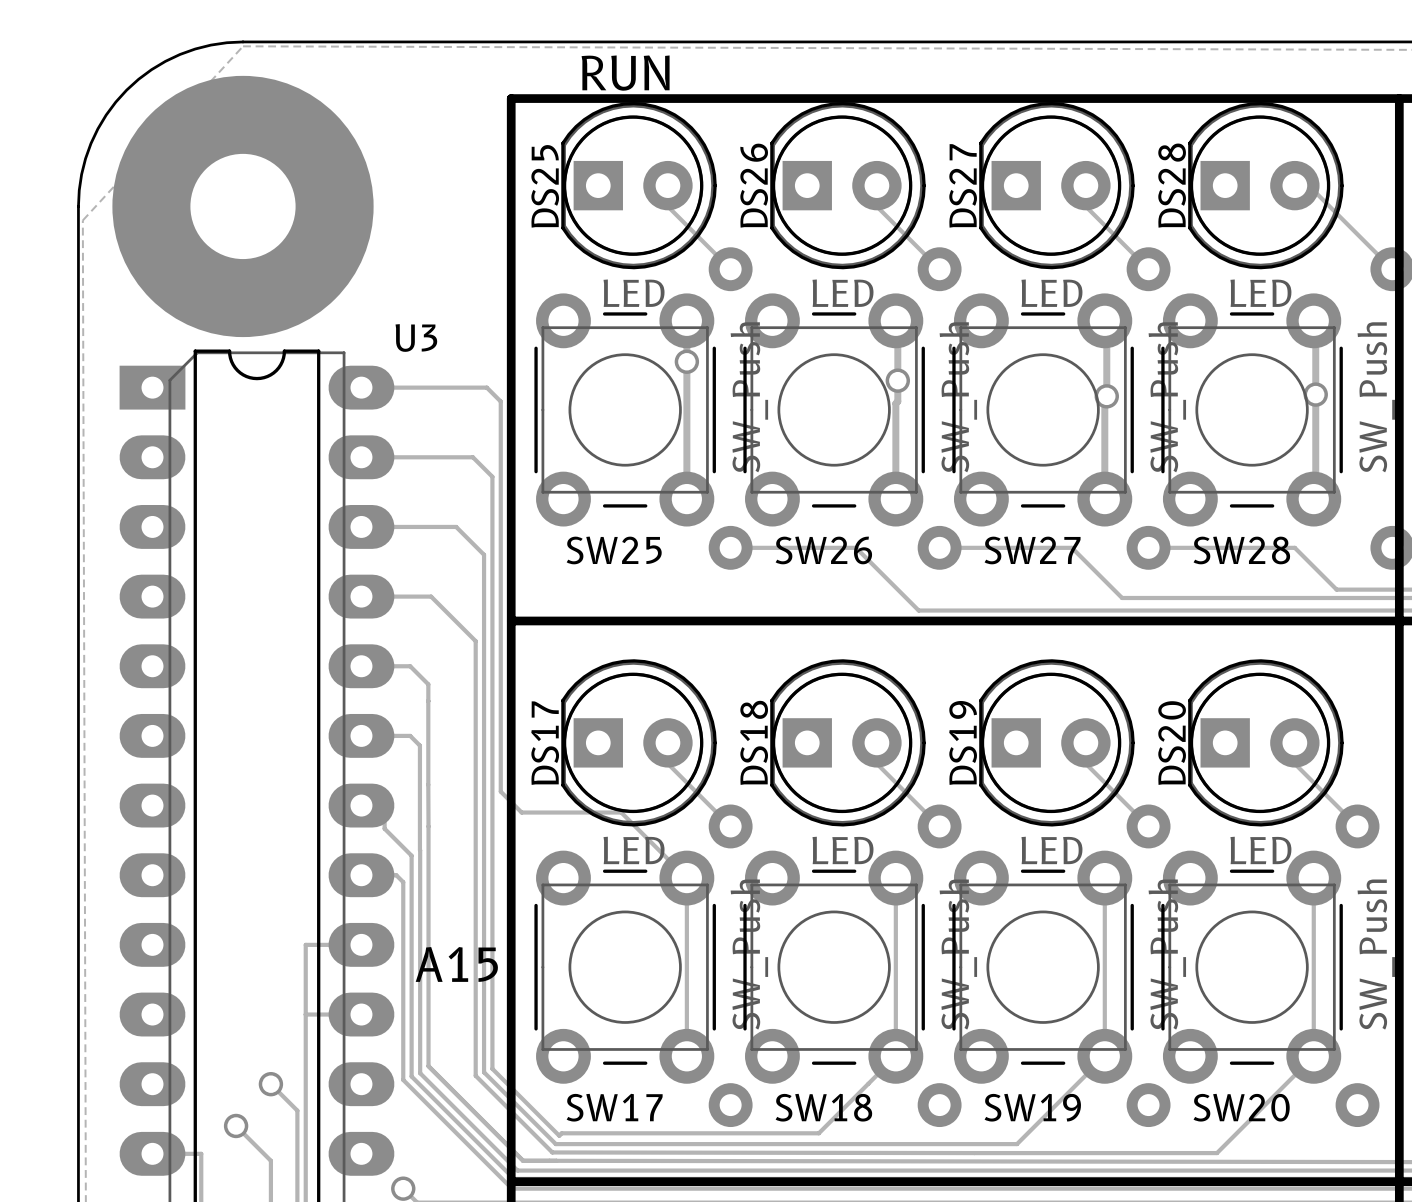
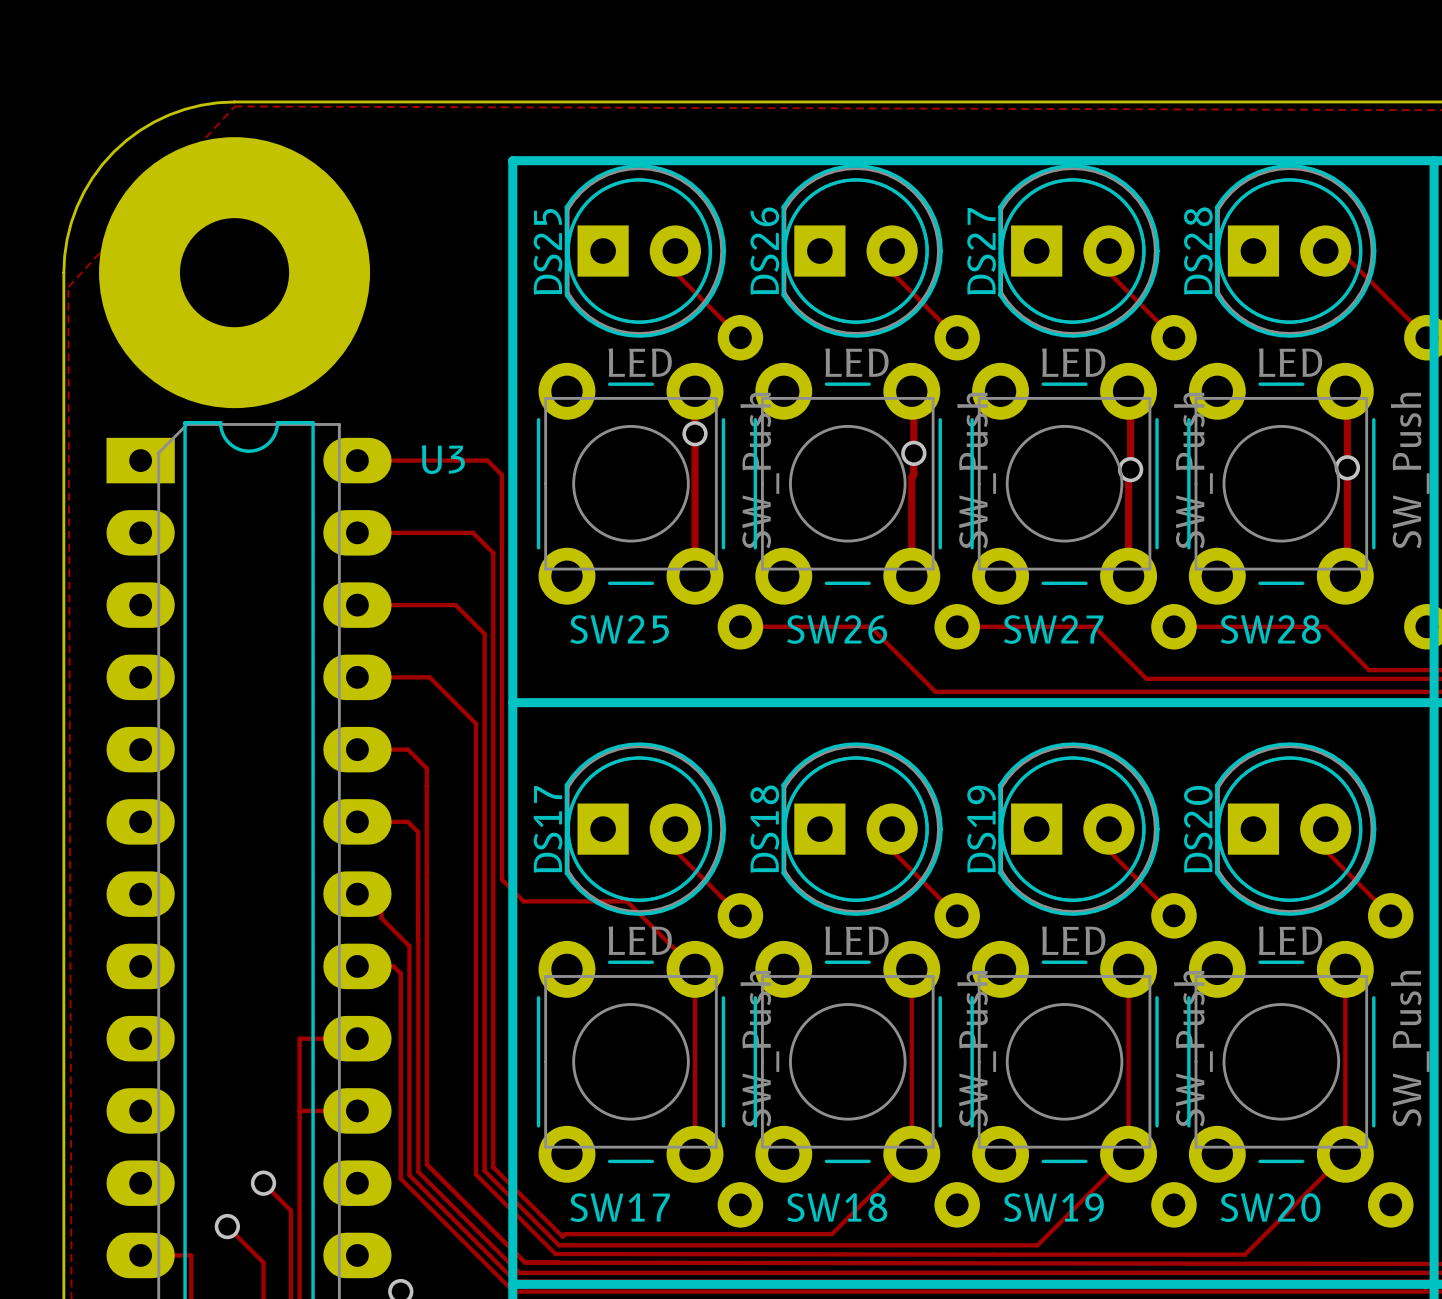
text: RUN (625, 73) -> none
U3 name position: U3 (416, 338) -> U3 (443, 459)
text: A15 (456, 964) -> none

